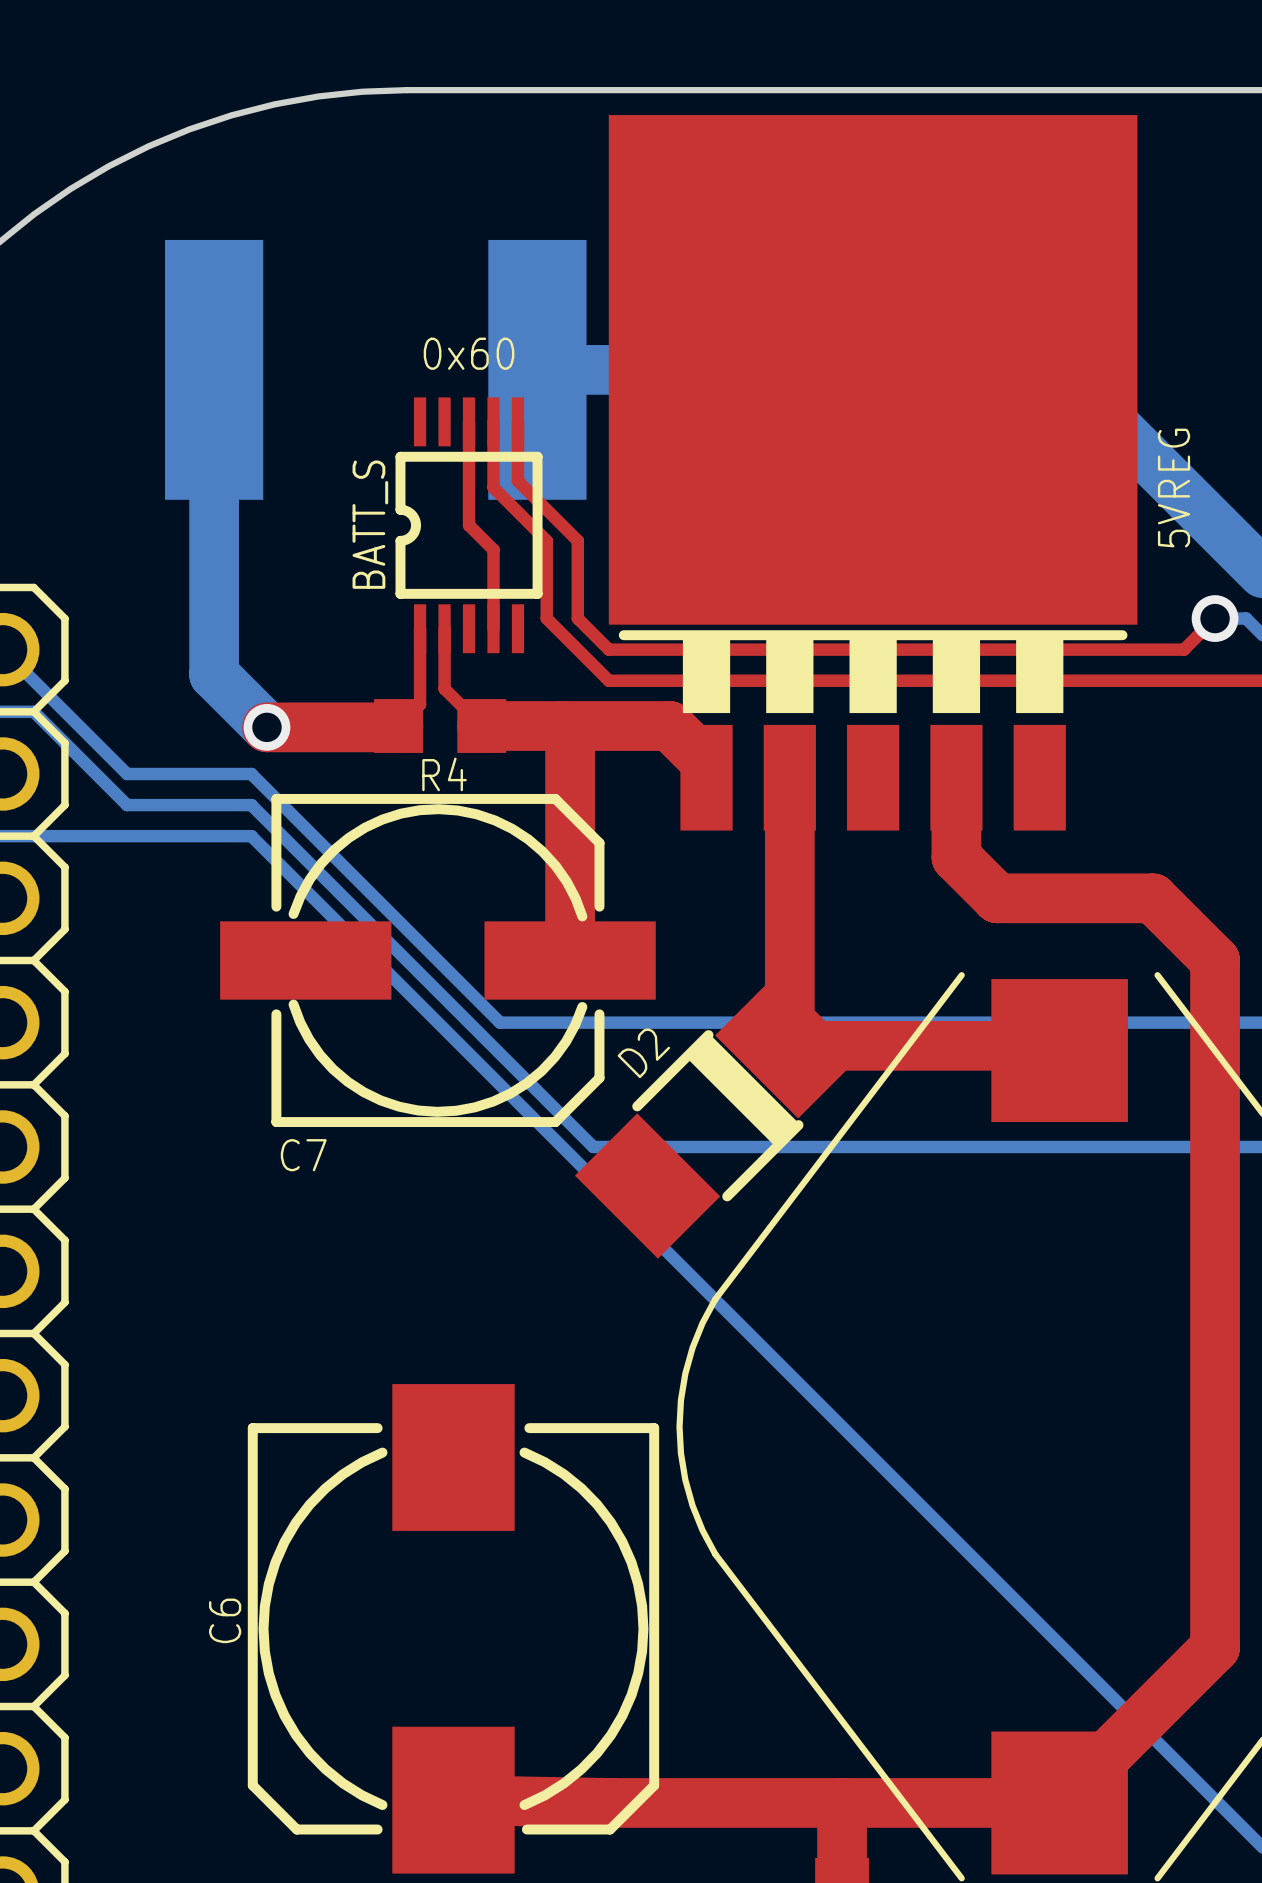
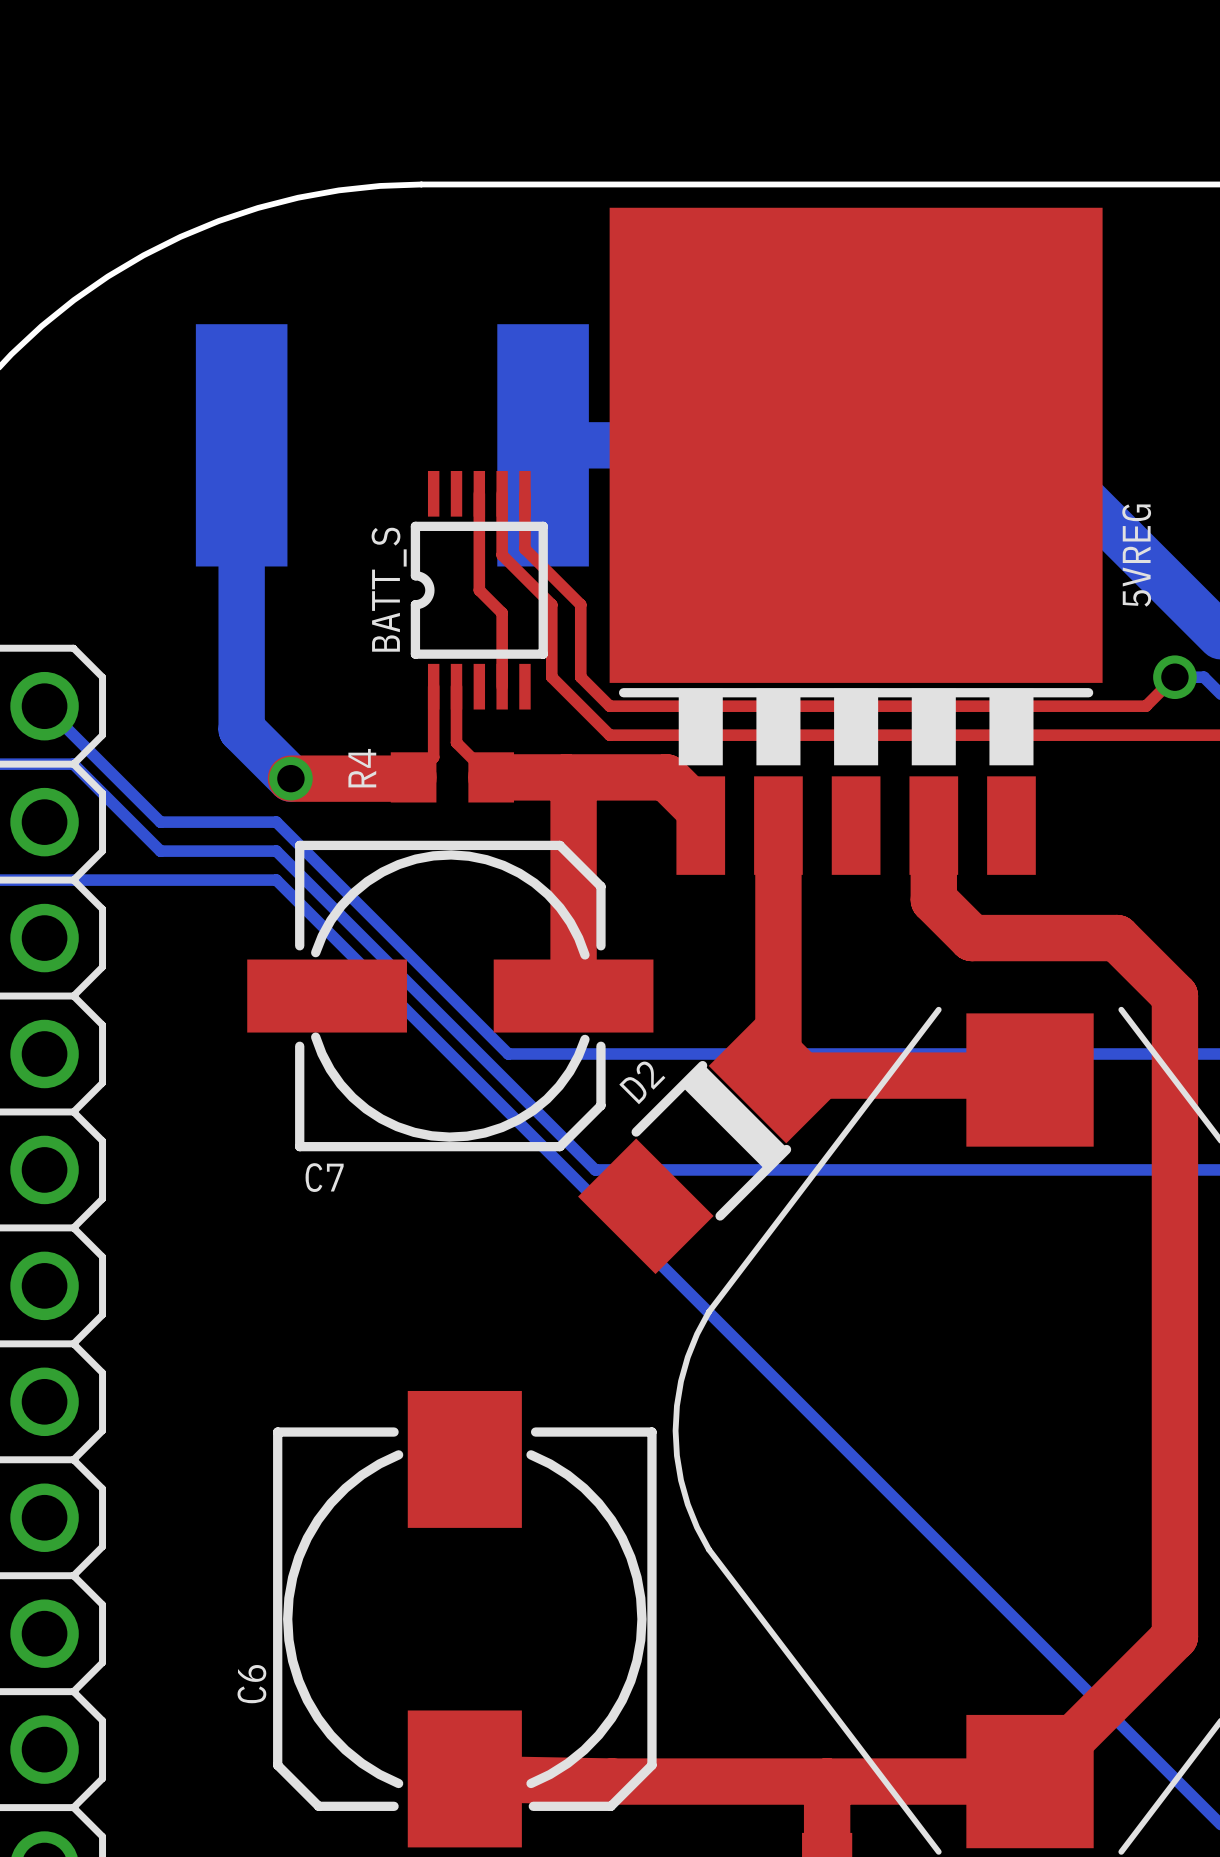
text: 0x60 (469, 353) -> none
R4 name rotation: 0° (444, 774) -> 90° counterclockwise (362, 768)
R4 name position: R4 (444, 774) -> R4 (362, 768)
C6 name position: C6 (225, 1620) -> C6 (251, 1684)

